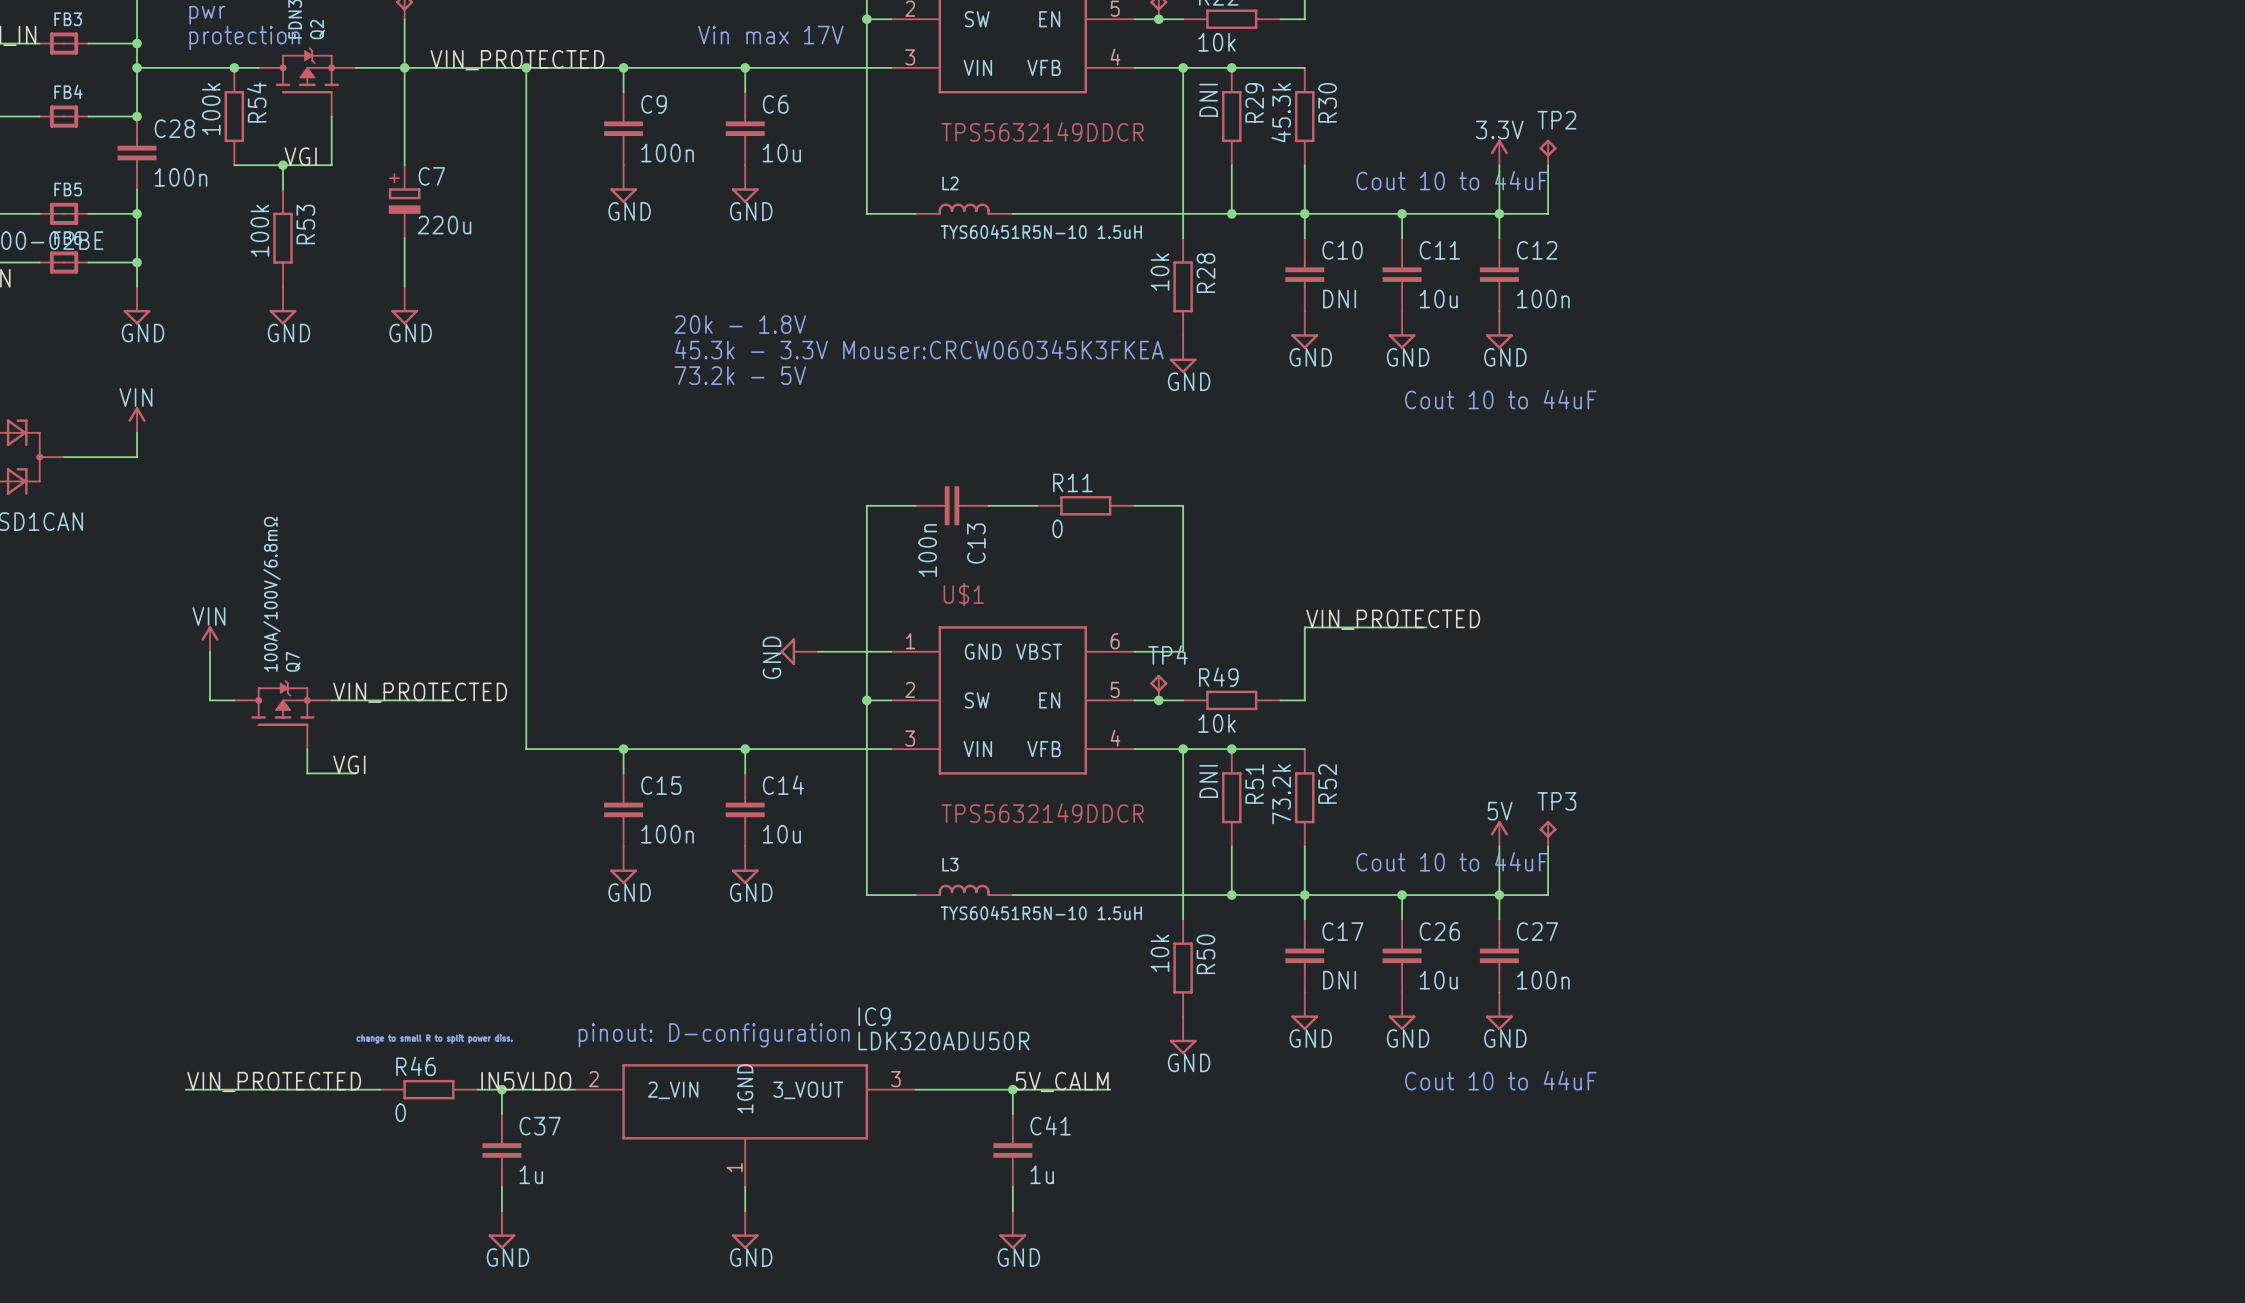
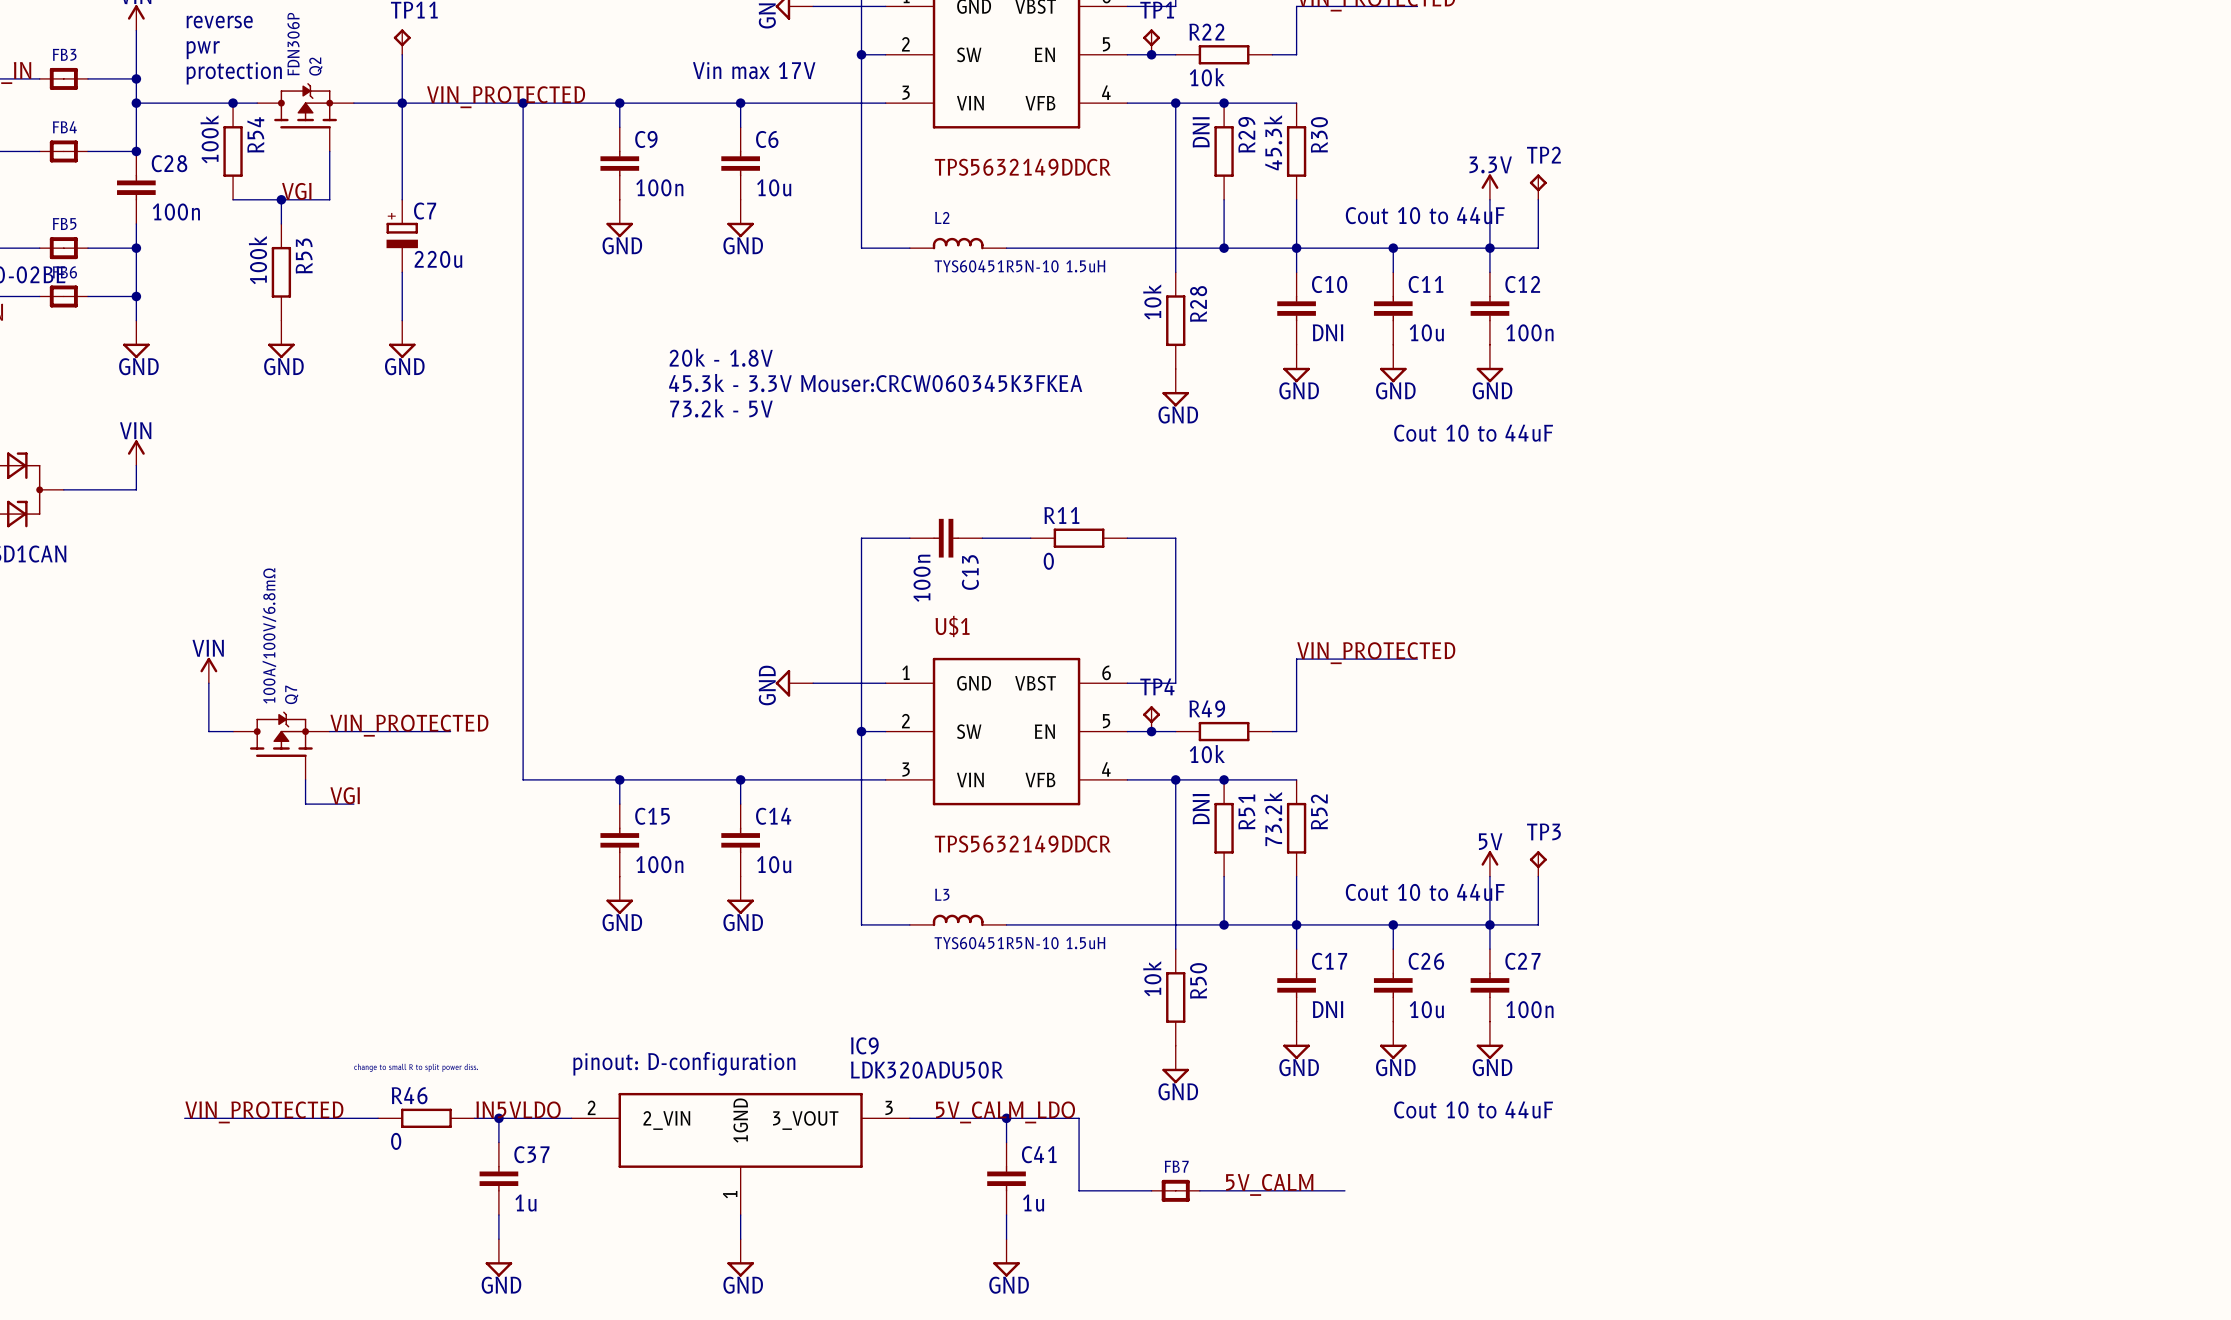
label: none -> 5V_CALM_LDO (1005, 1112)
label position: 5V_CALM (1062, 1081) -> 5V_CALM (1269, 1184)
wire: (1085, 1089) (1110, 1089) -> (1079, 1118) (1079, 1190) (1151, 1190)
FB7: none -> (1175, 1190)
wire: none -> (1199, 1190) (1344, 1190)

